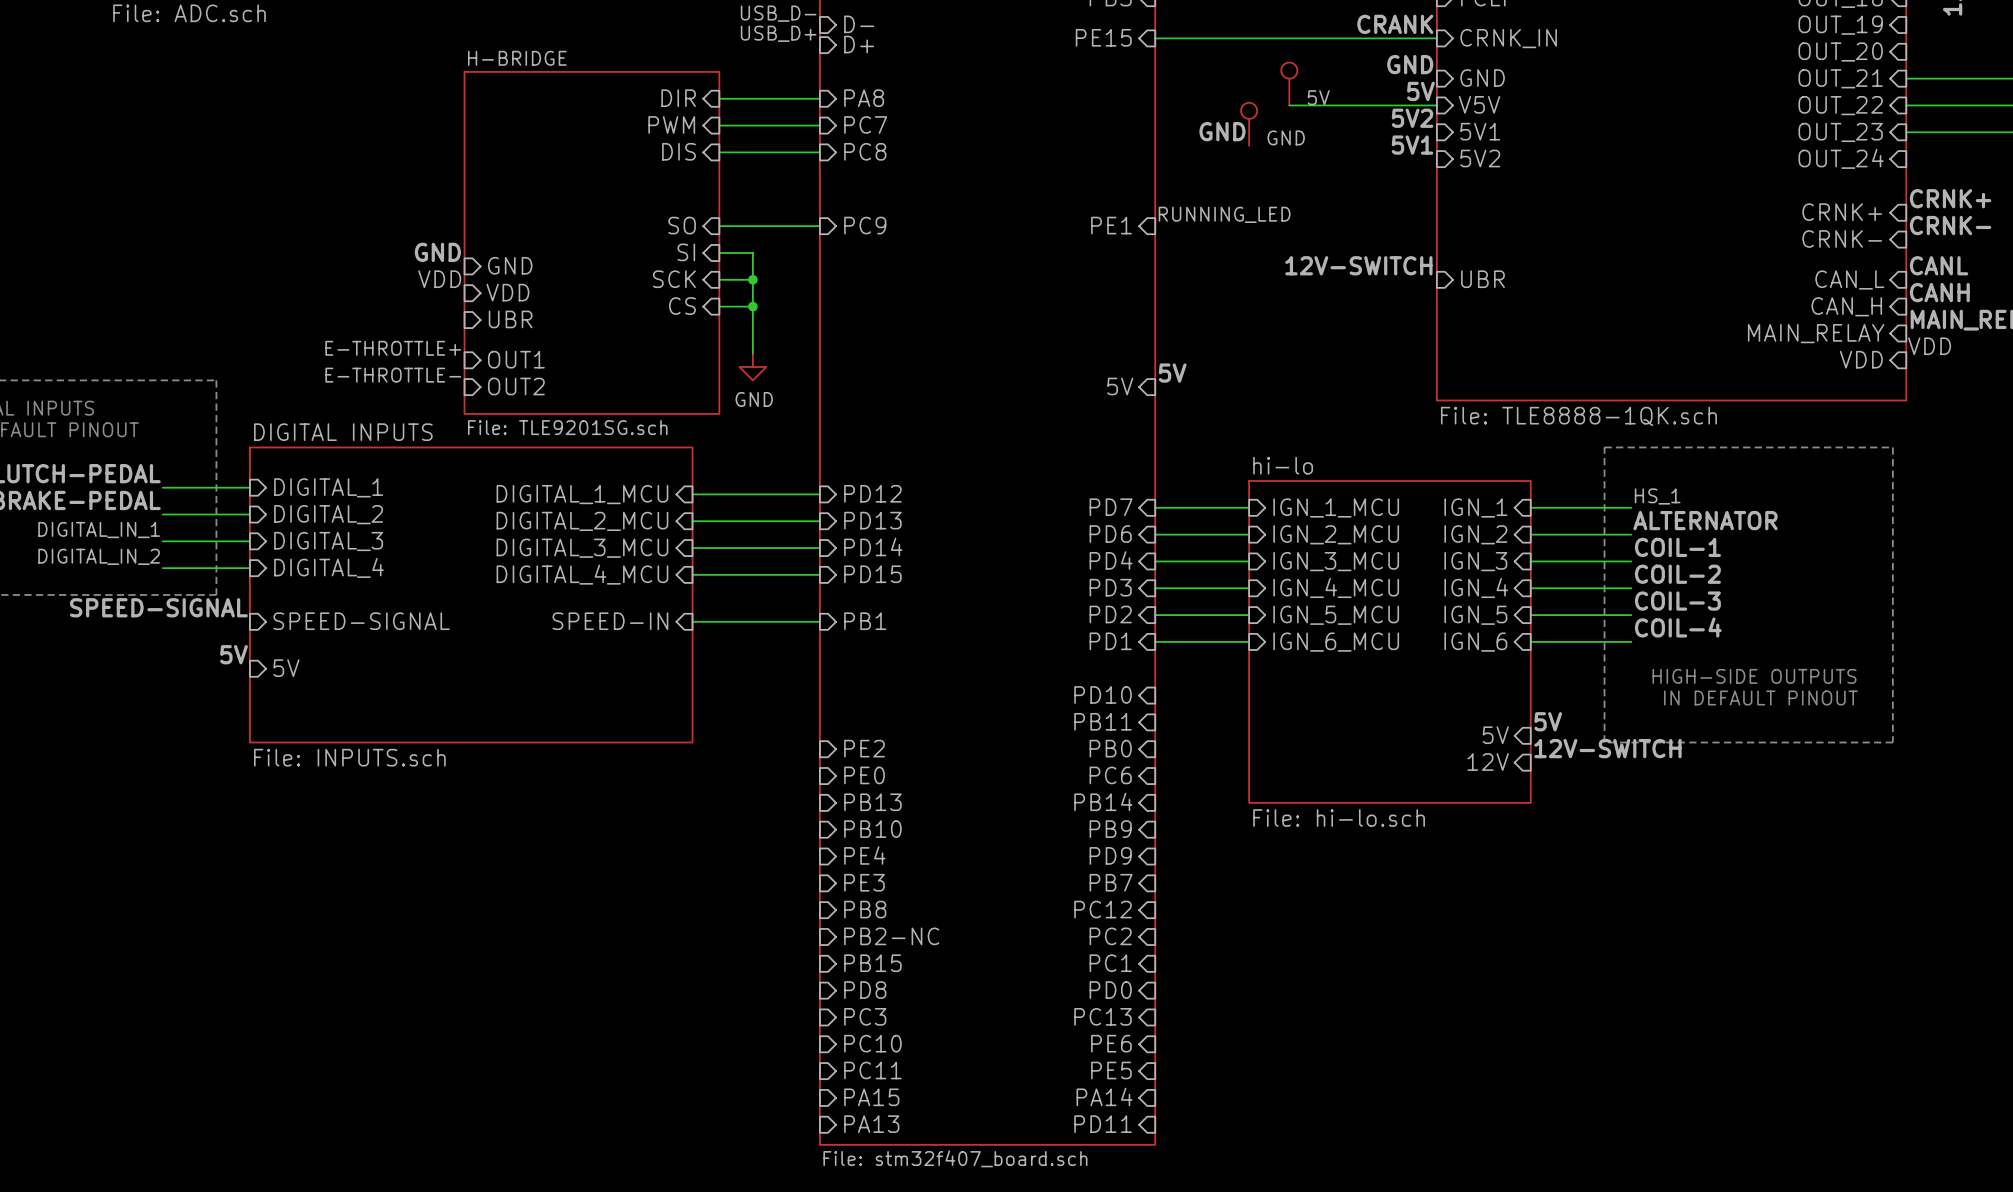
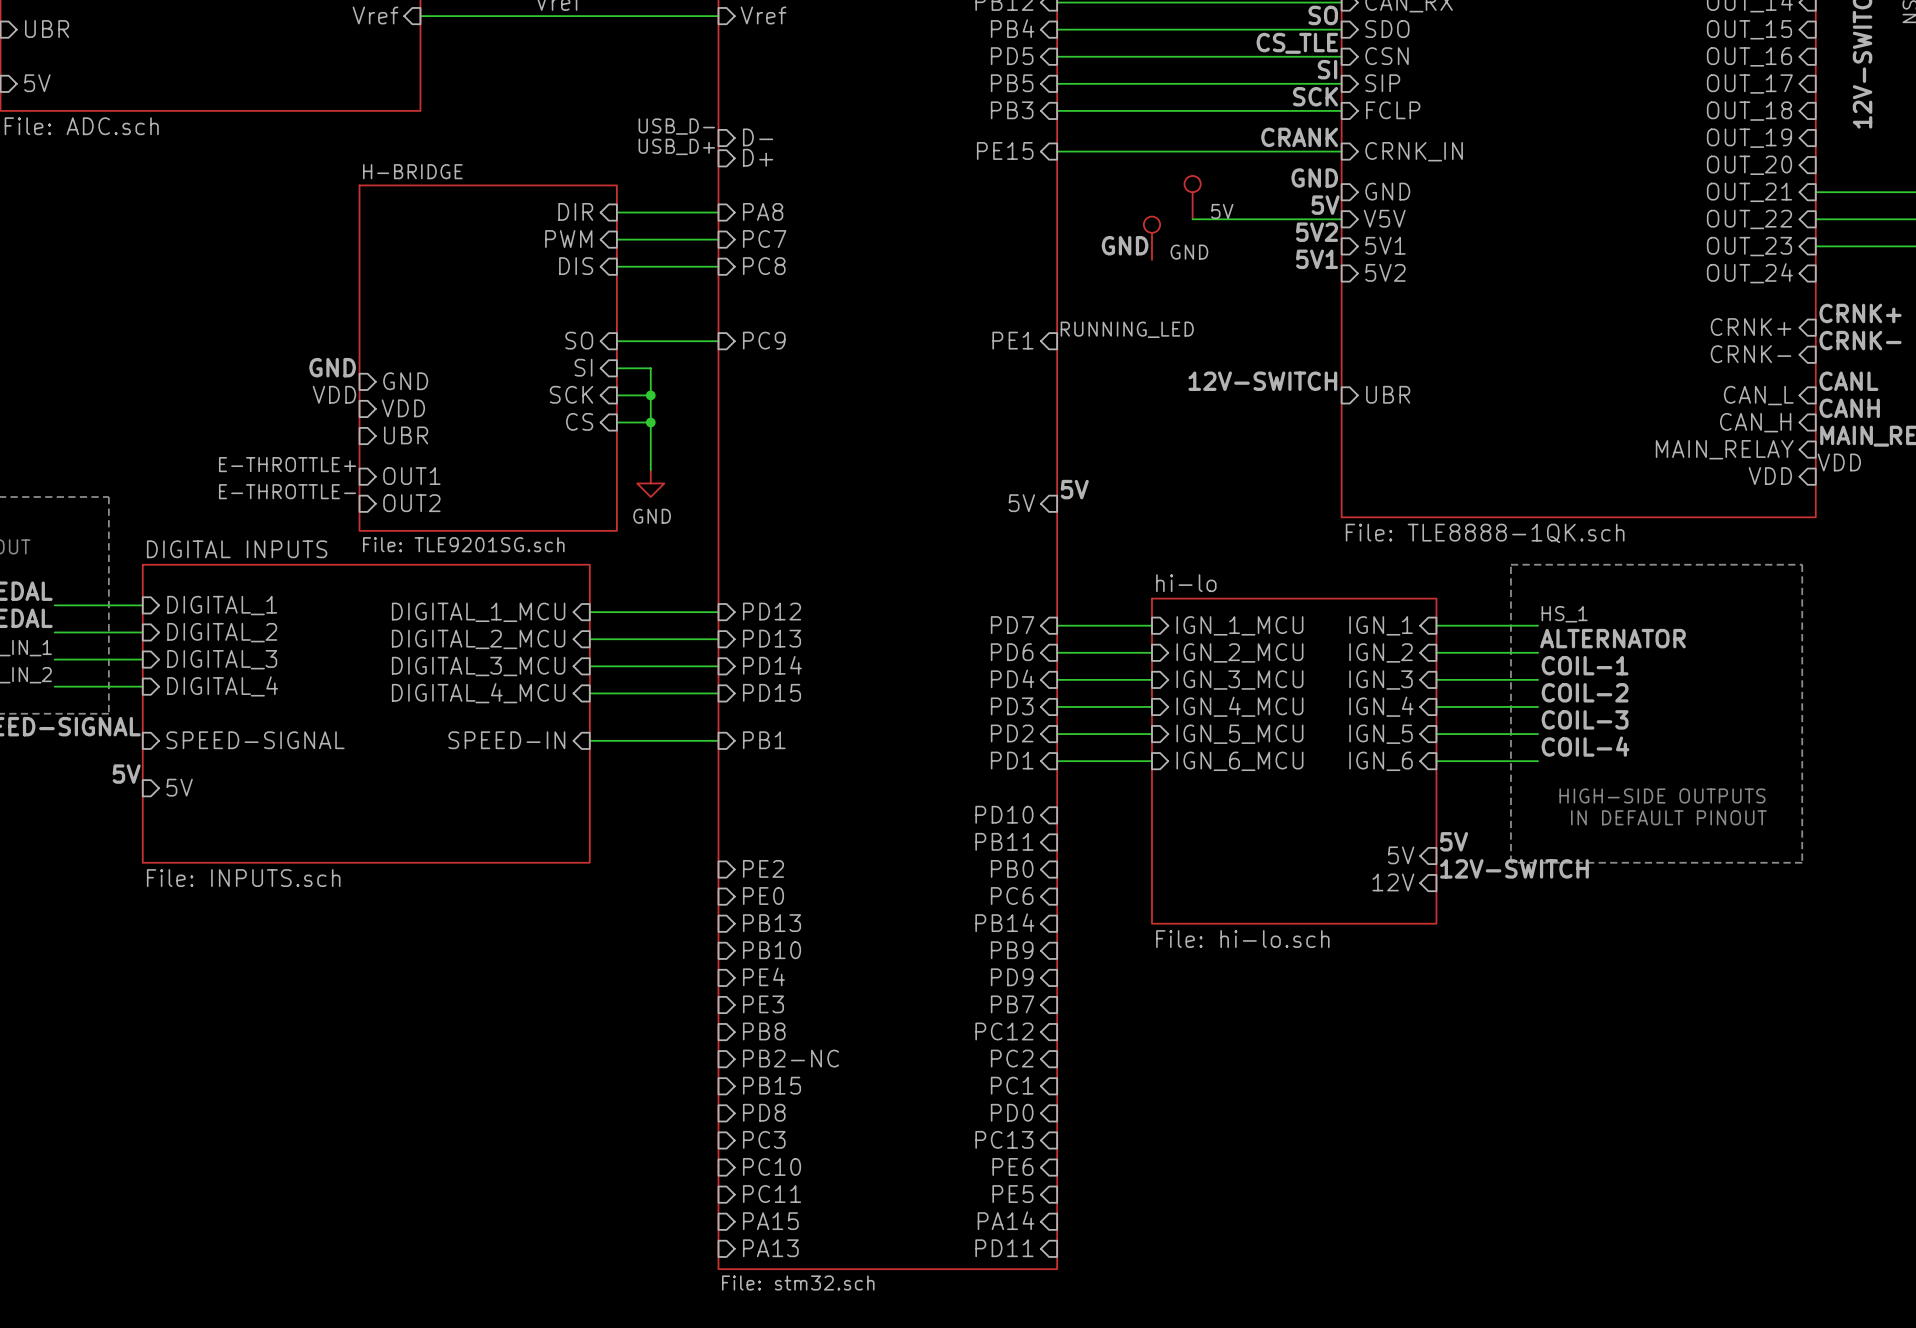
sheet value: File: stm32f407_board.sch (955, 1158) -> File: stm32.sch (798, 1282)

